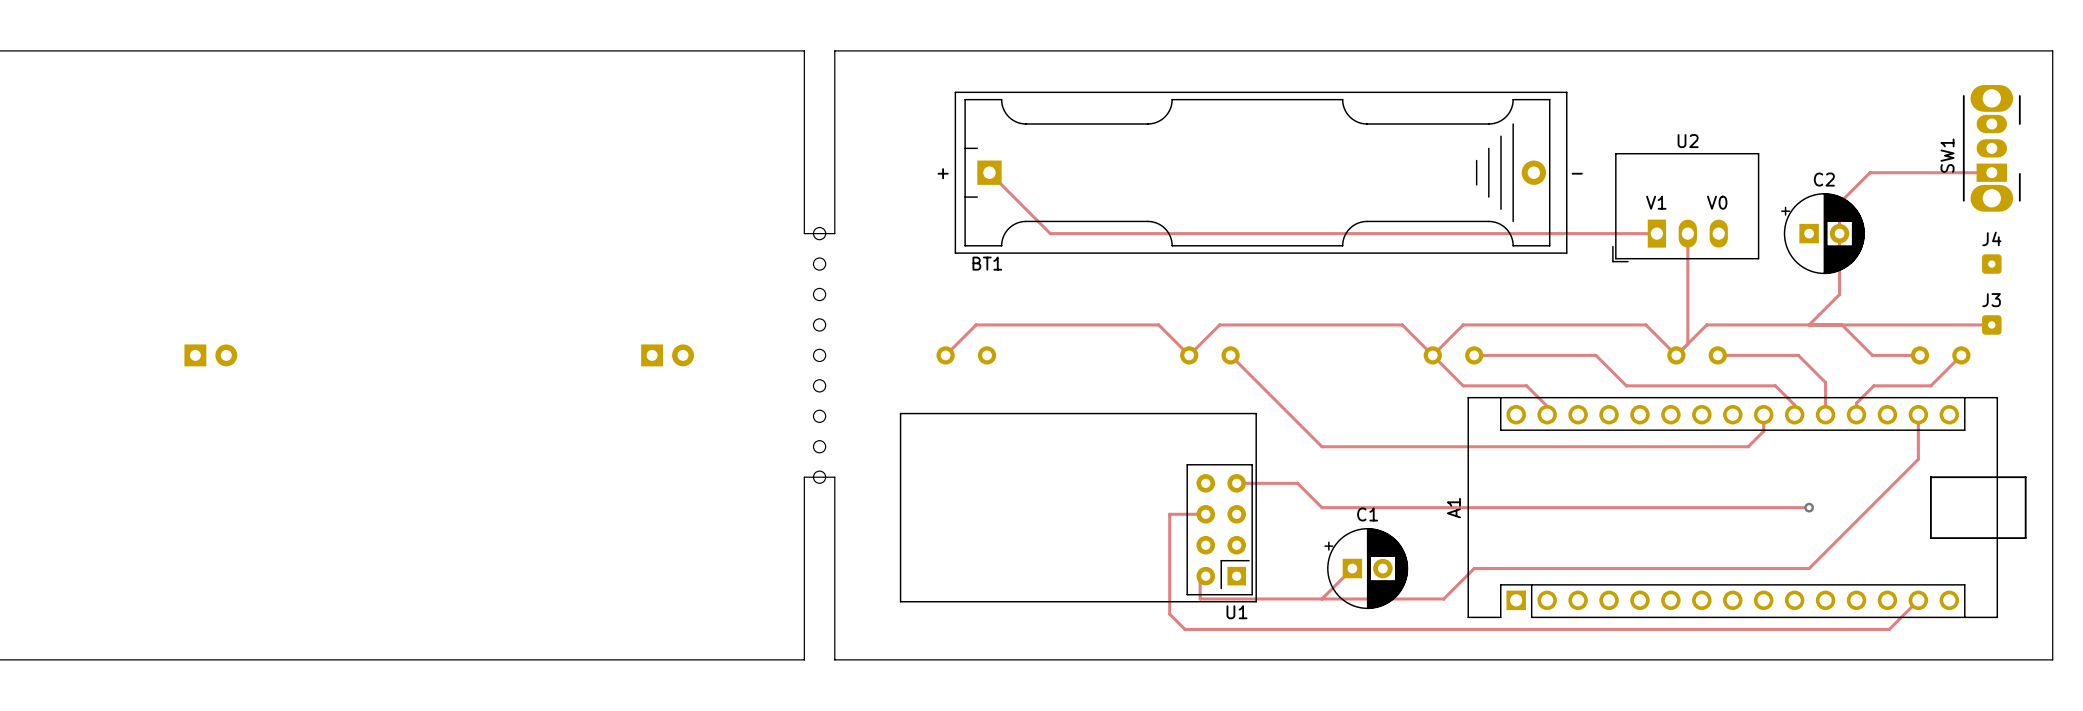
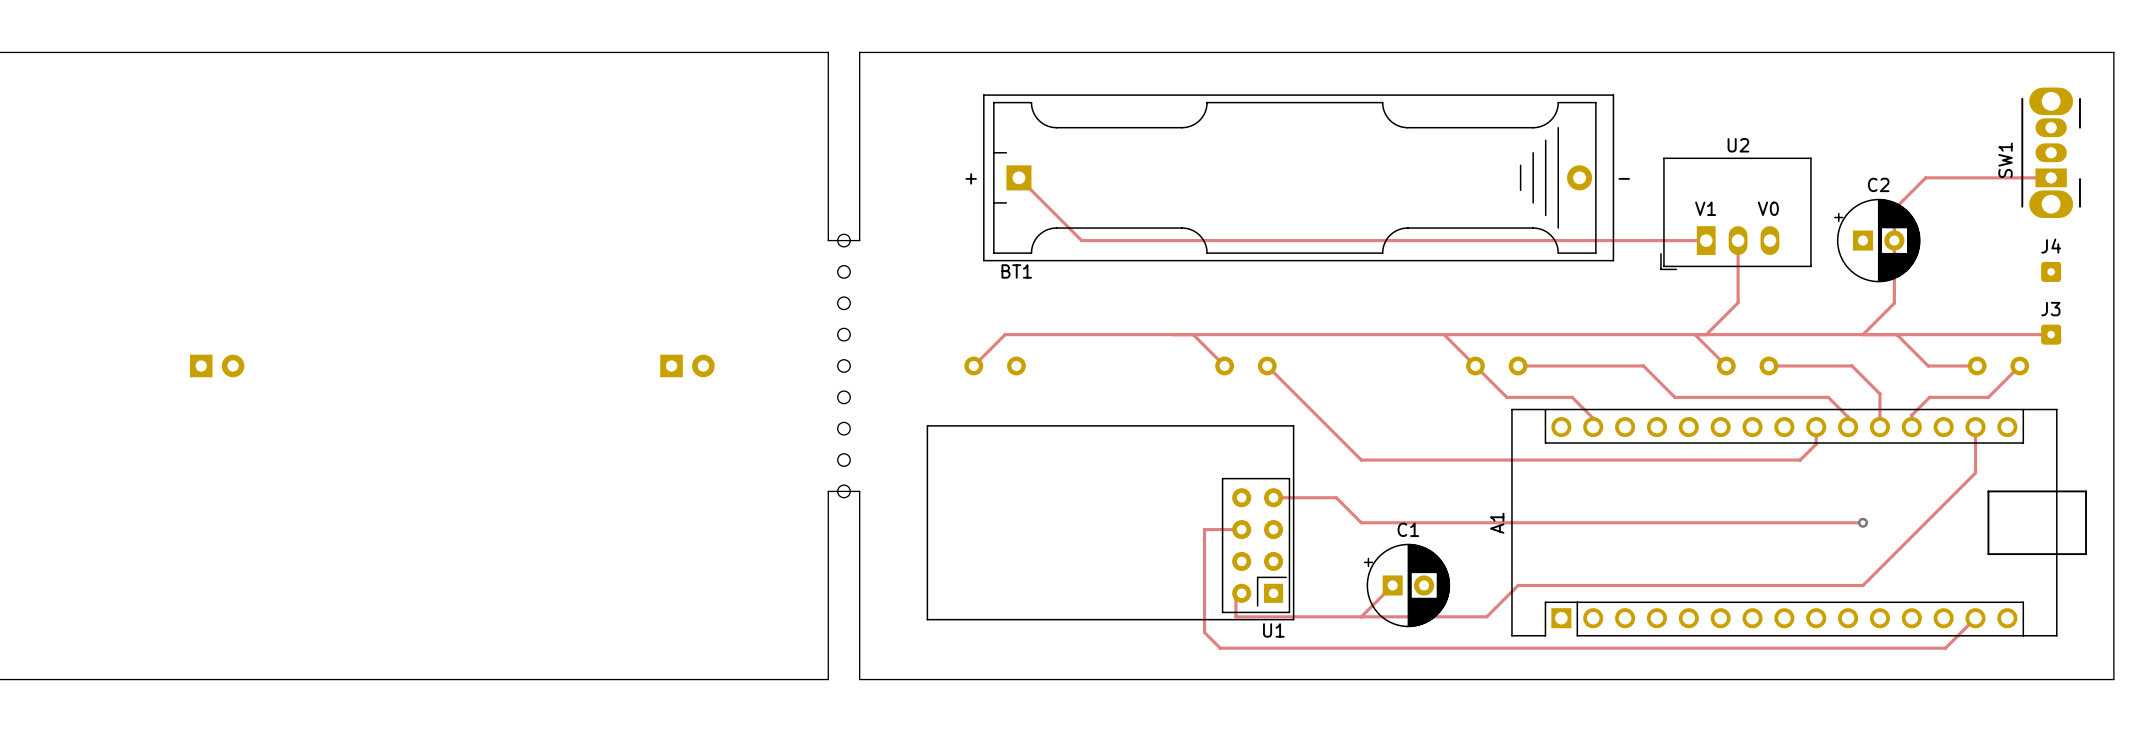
track: (1687, 294) (1687, 343) -> (1738, 302) (1706, 334)
track: (1219, 324) (1189, 355) -> (1255, 334) (1193, 334)
track: (1463, 324) (1432, 355) -> (1506, 334) (1444, 334)
track: (1706, 324) (1676, 355) -> (1757, 334) (1694, 334)

